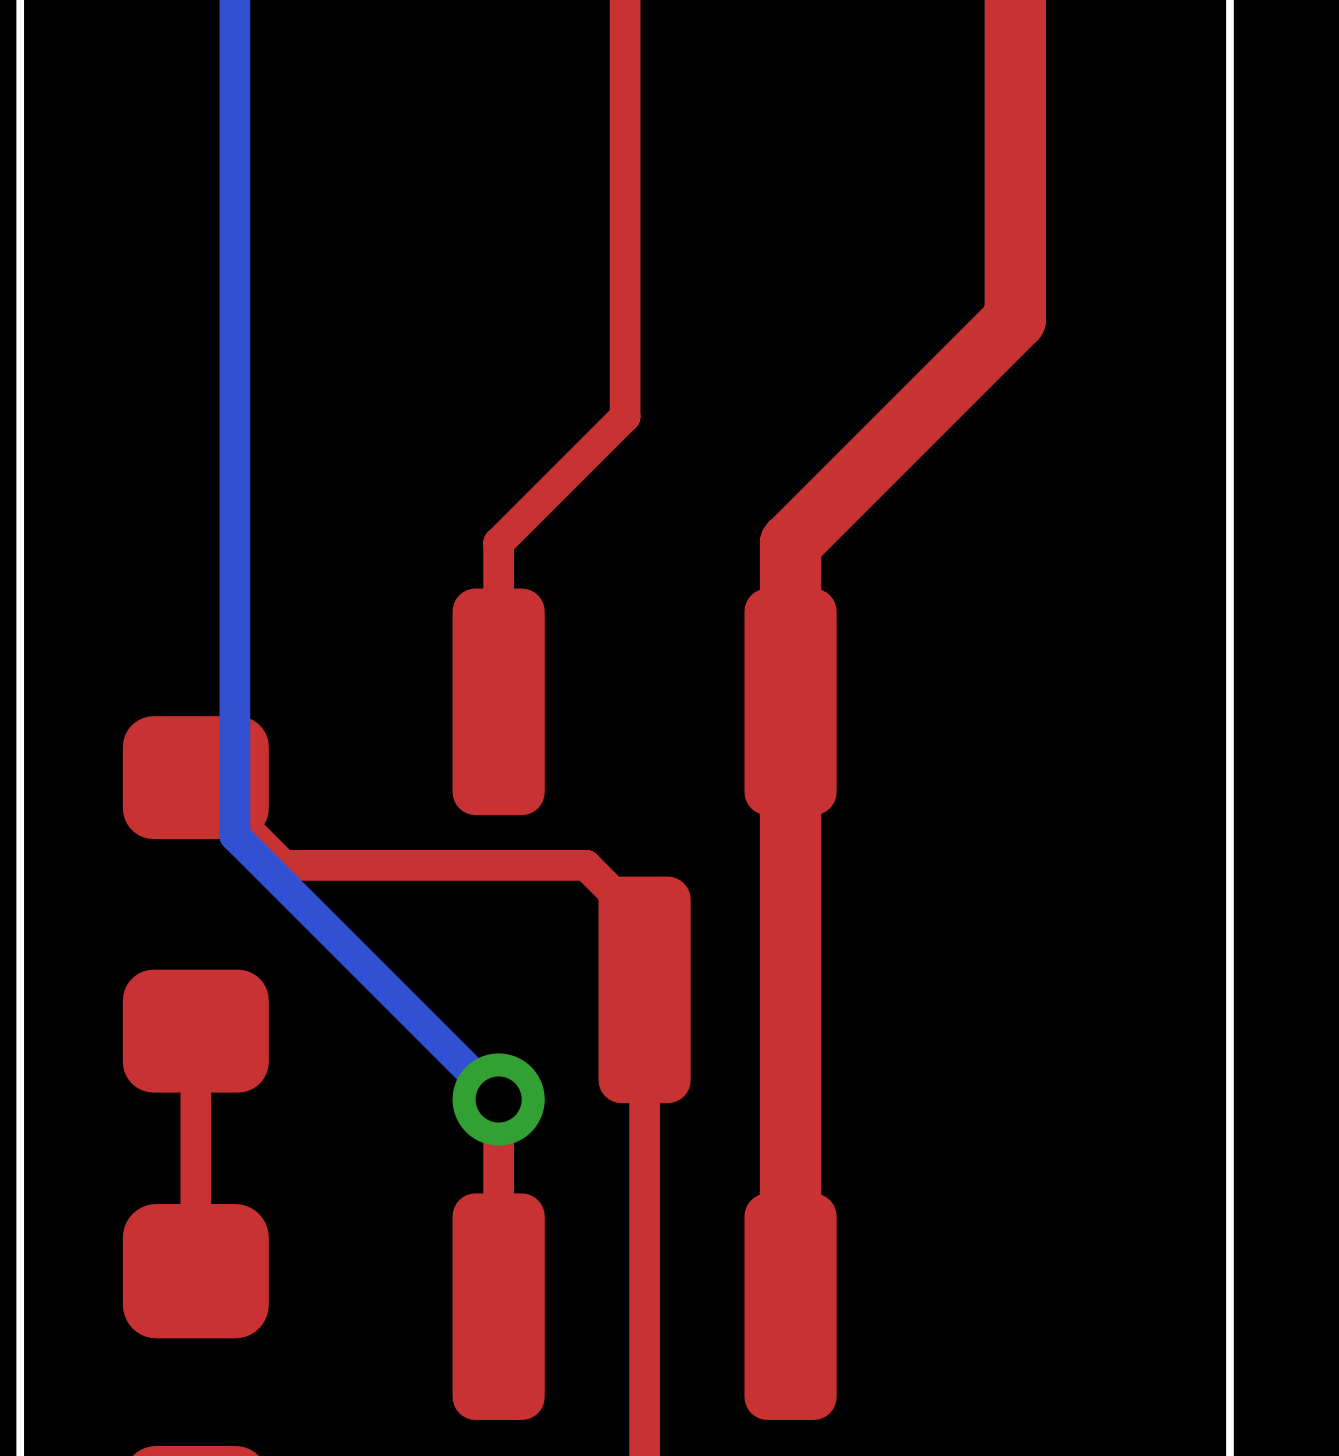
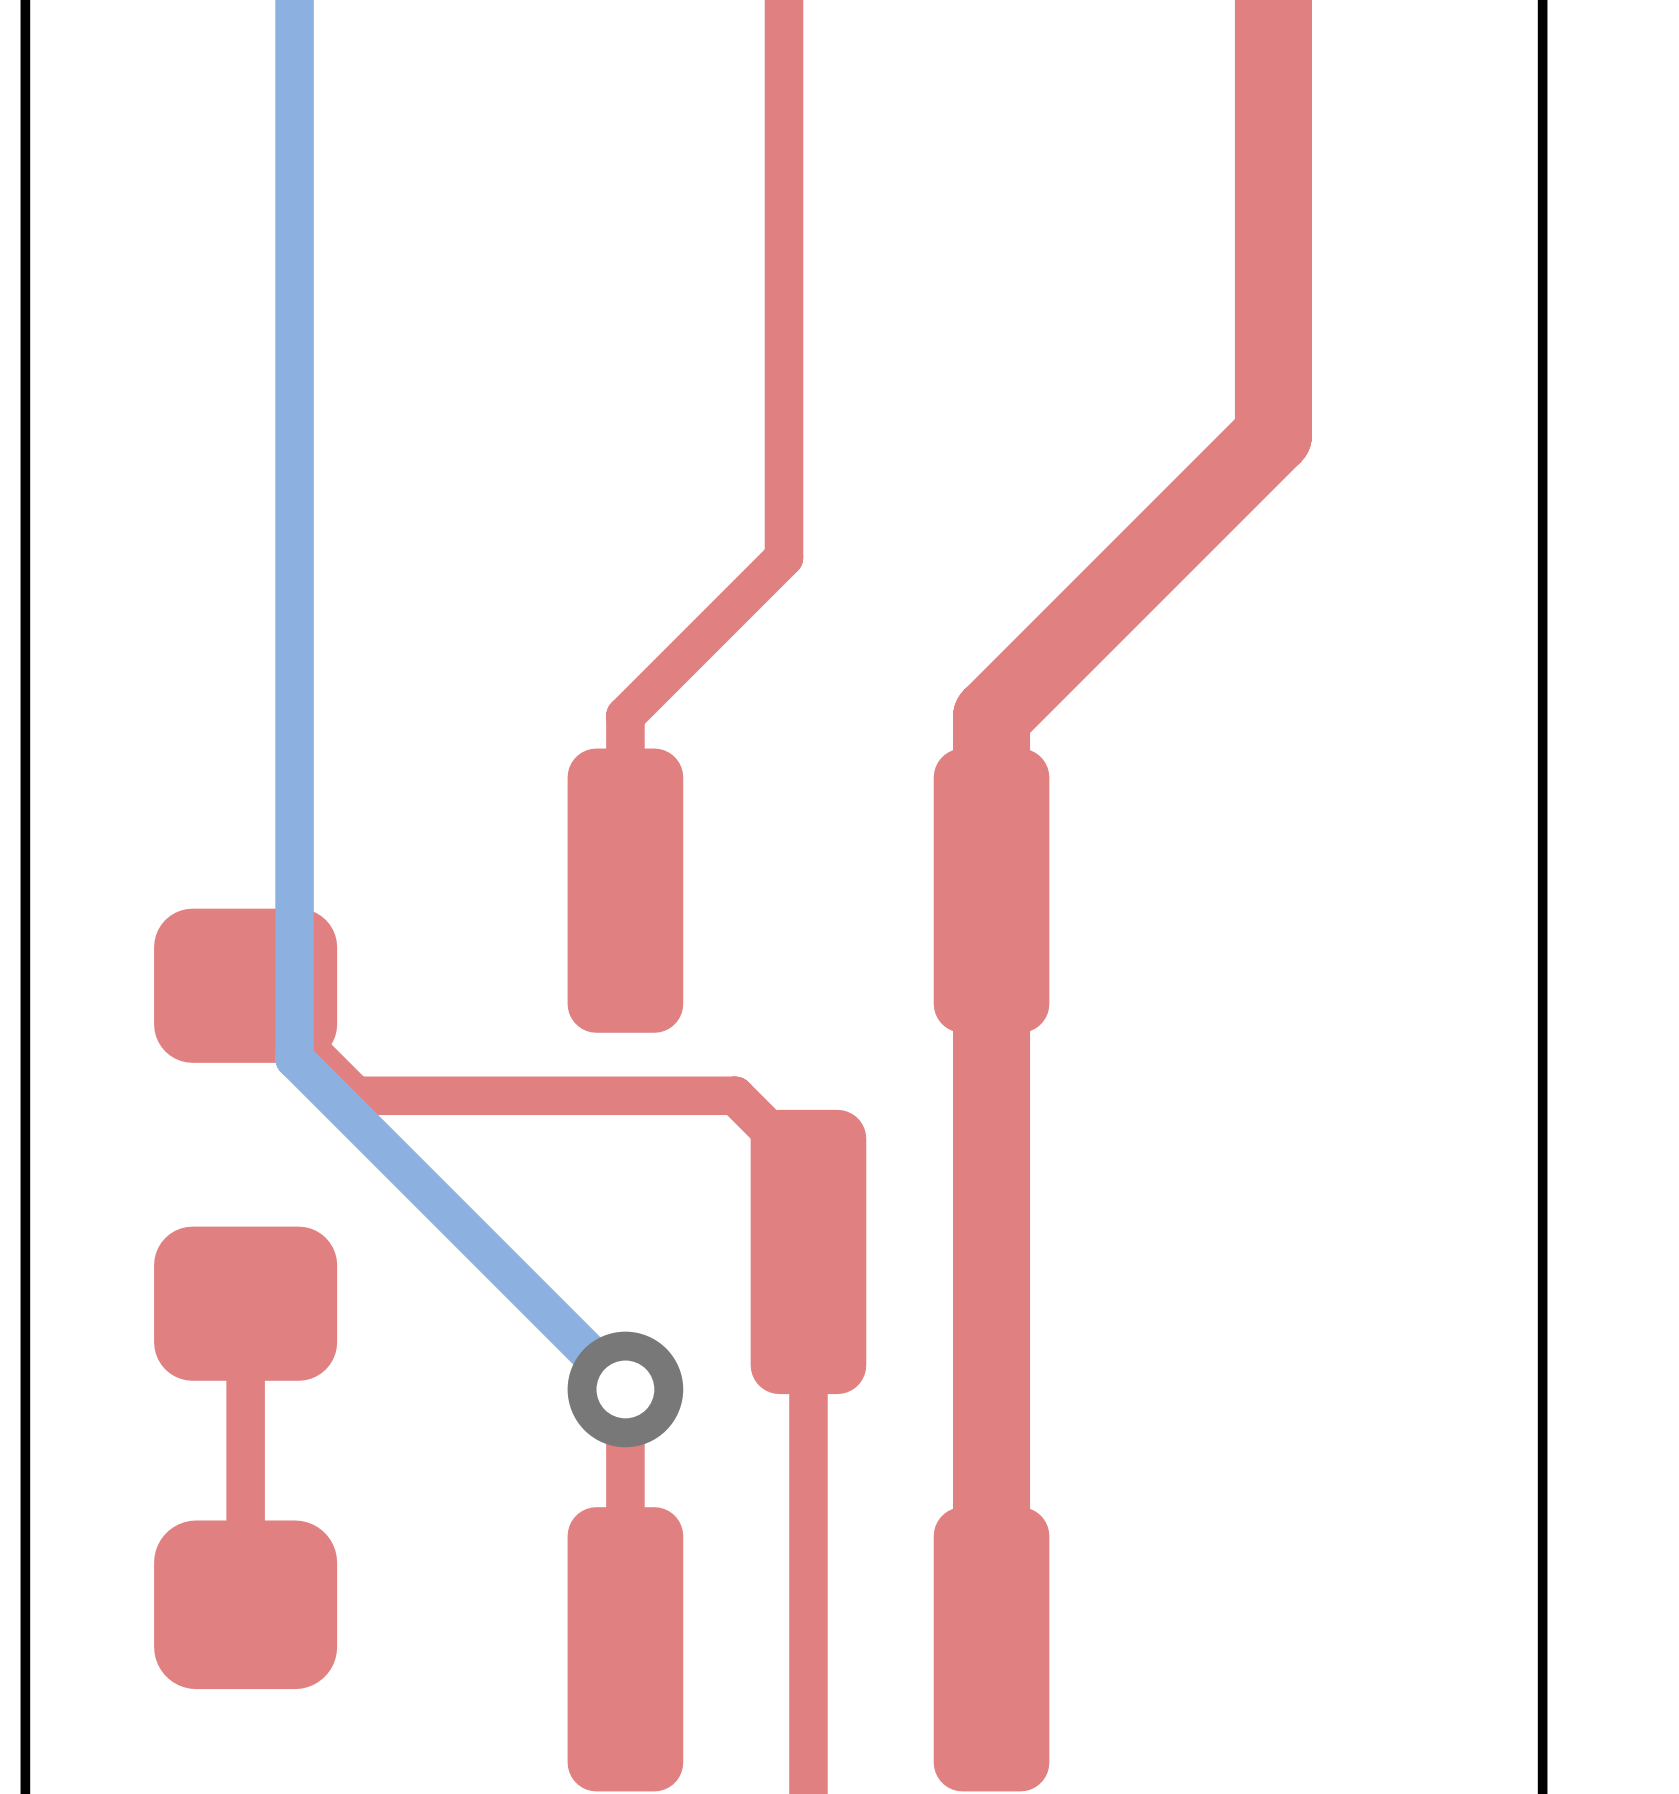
top track: (1015, 319) (790, 543) (790, 563) -> (1273, 410) (1273, 435) (991, 716)
top track: (625, 416) (498, 543) (498, 562) -> (784, 532) (784, 557) (625, 715)

